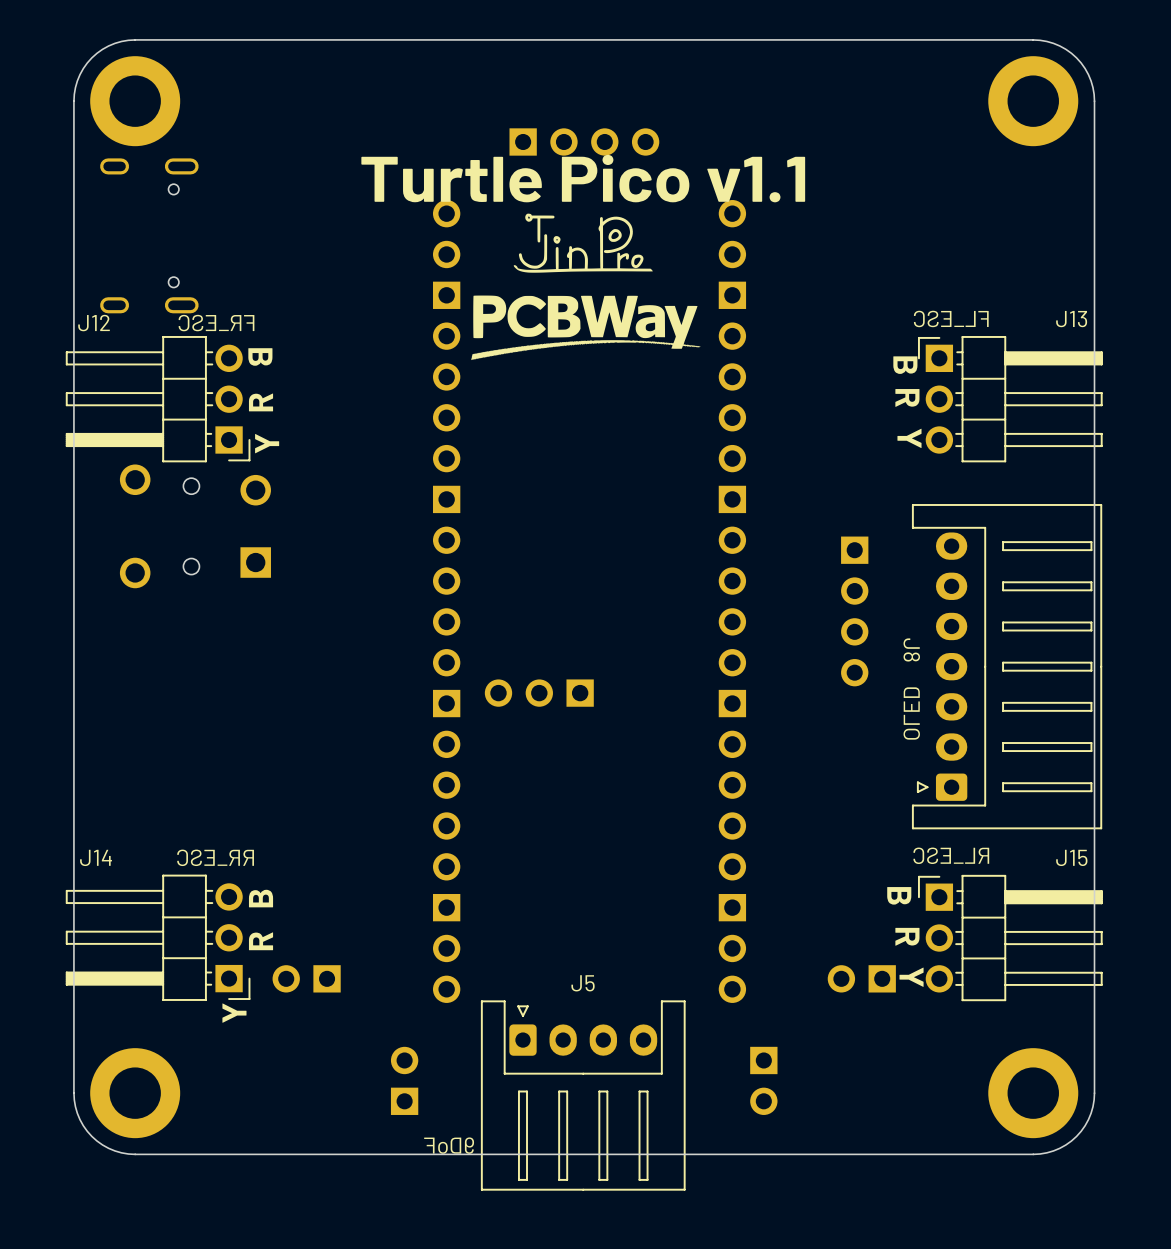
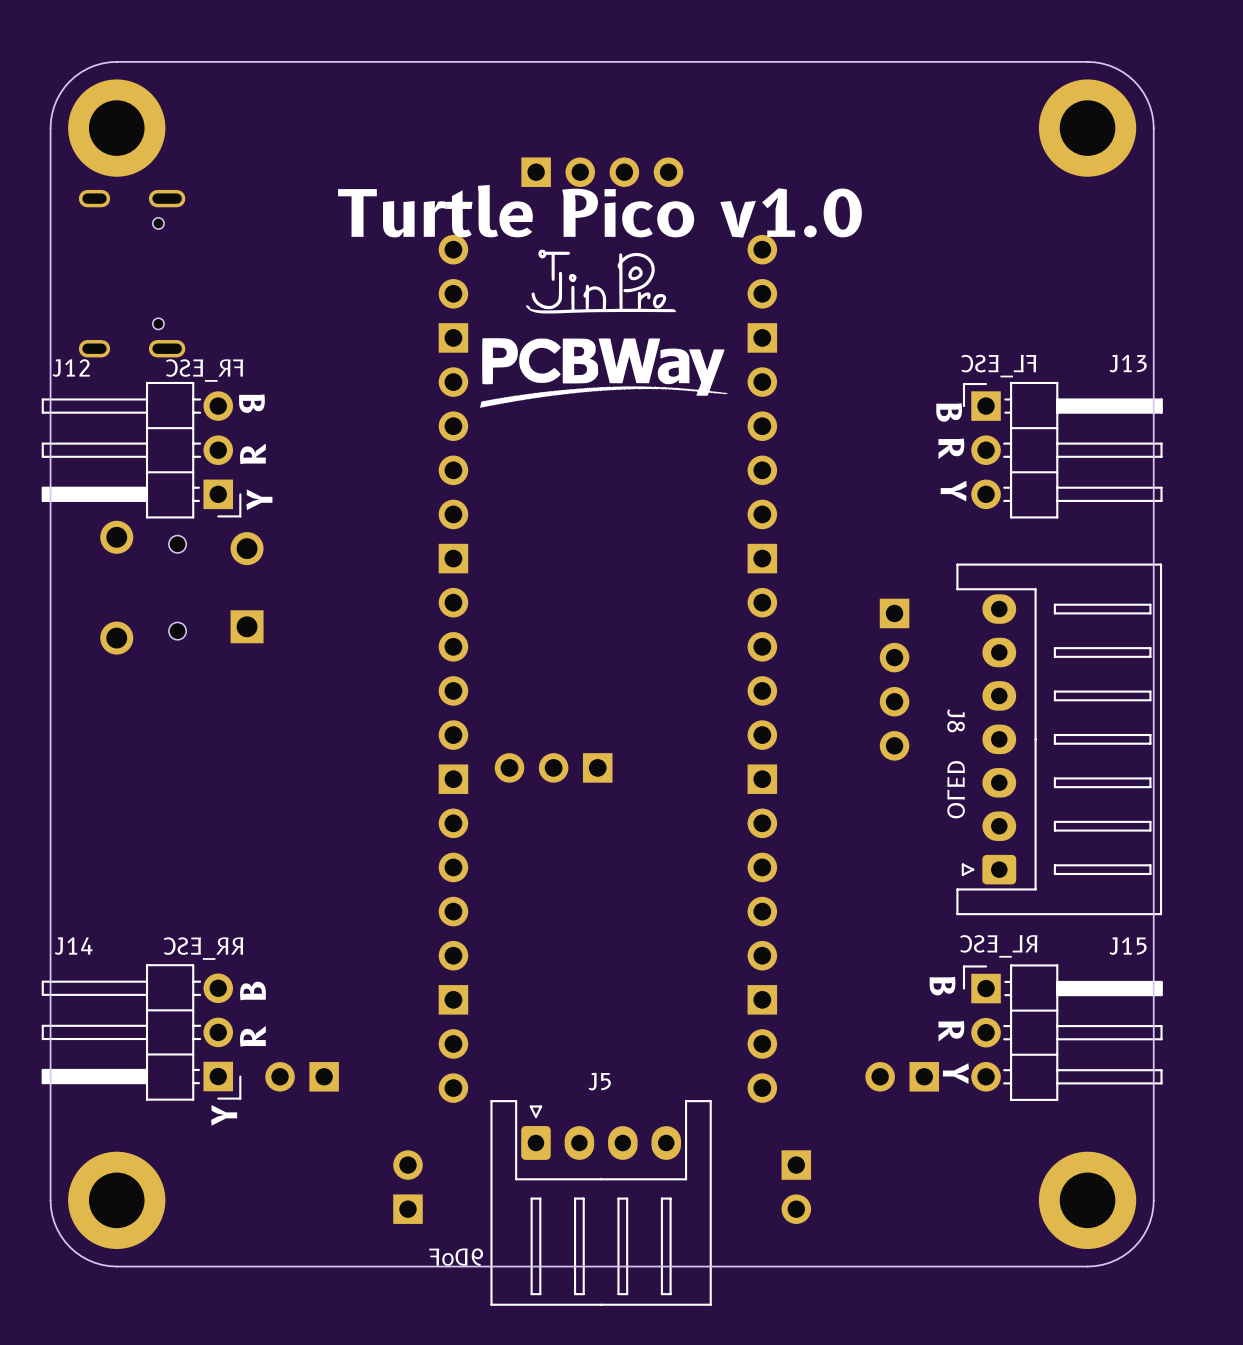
text: Turtle Pico v1.1 (583, 178) -> Turtle Pico v1.0 (599, 211)

